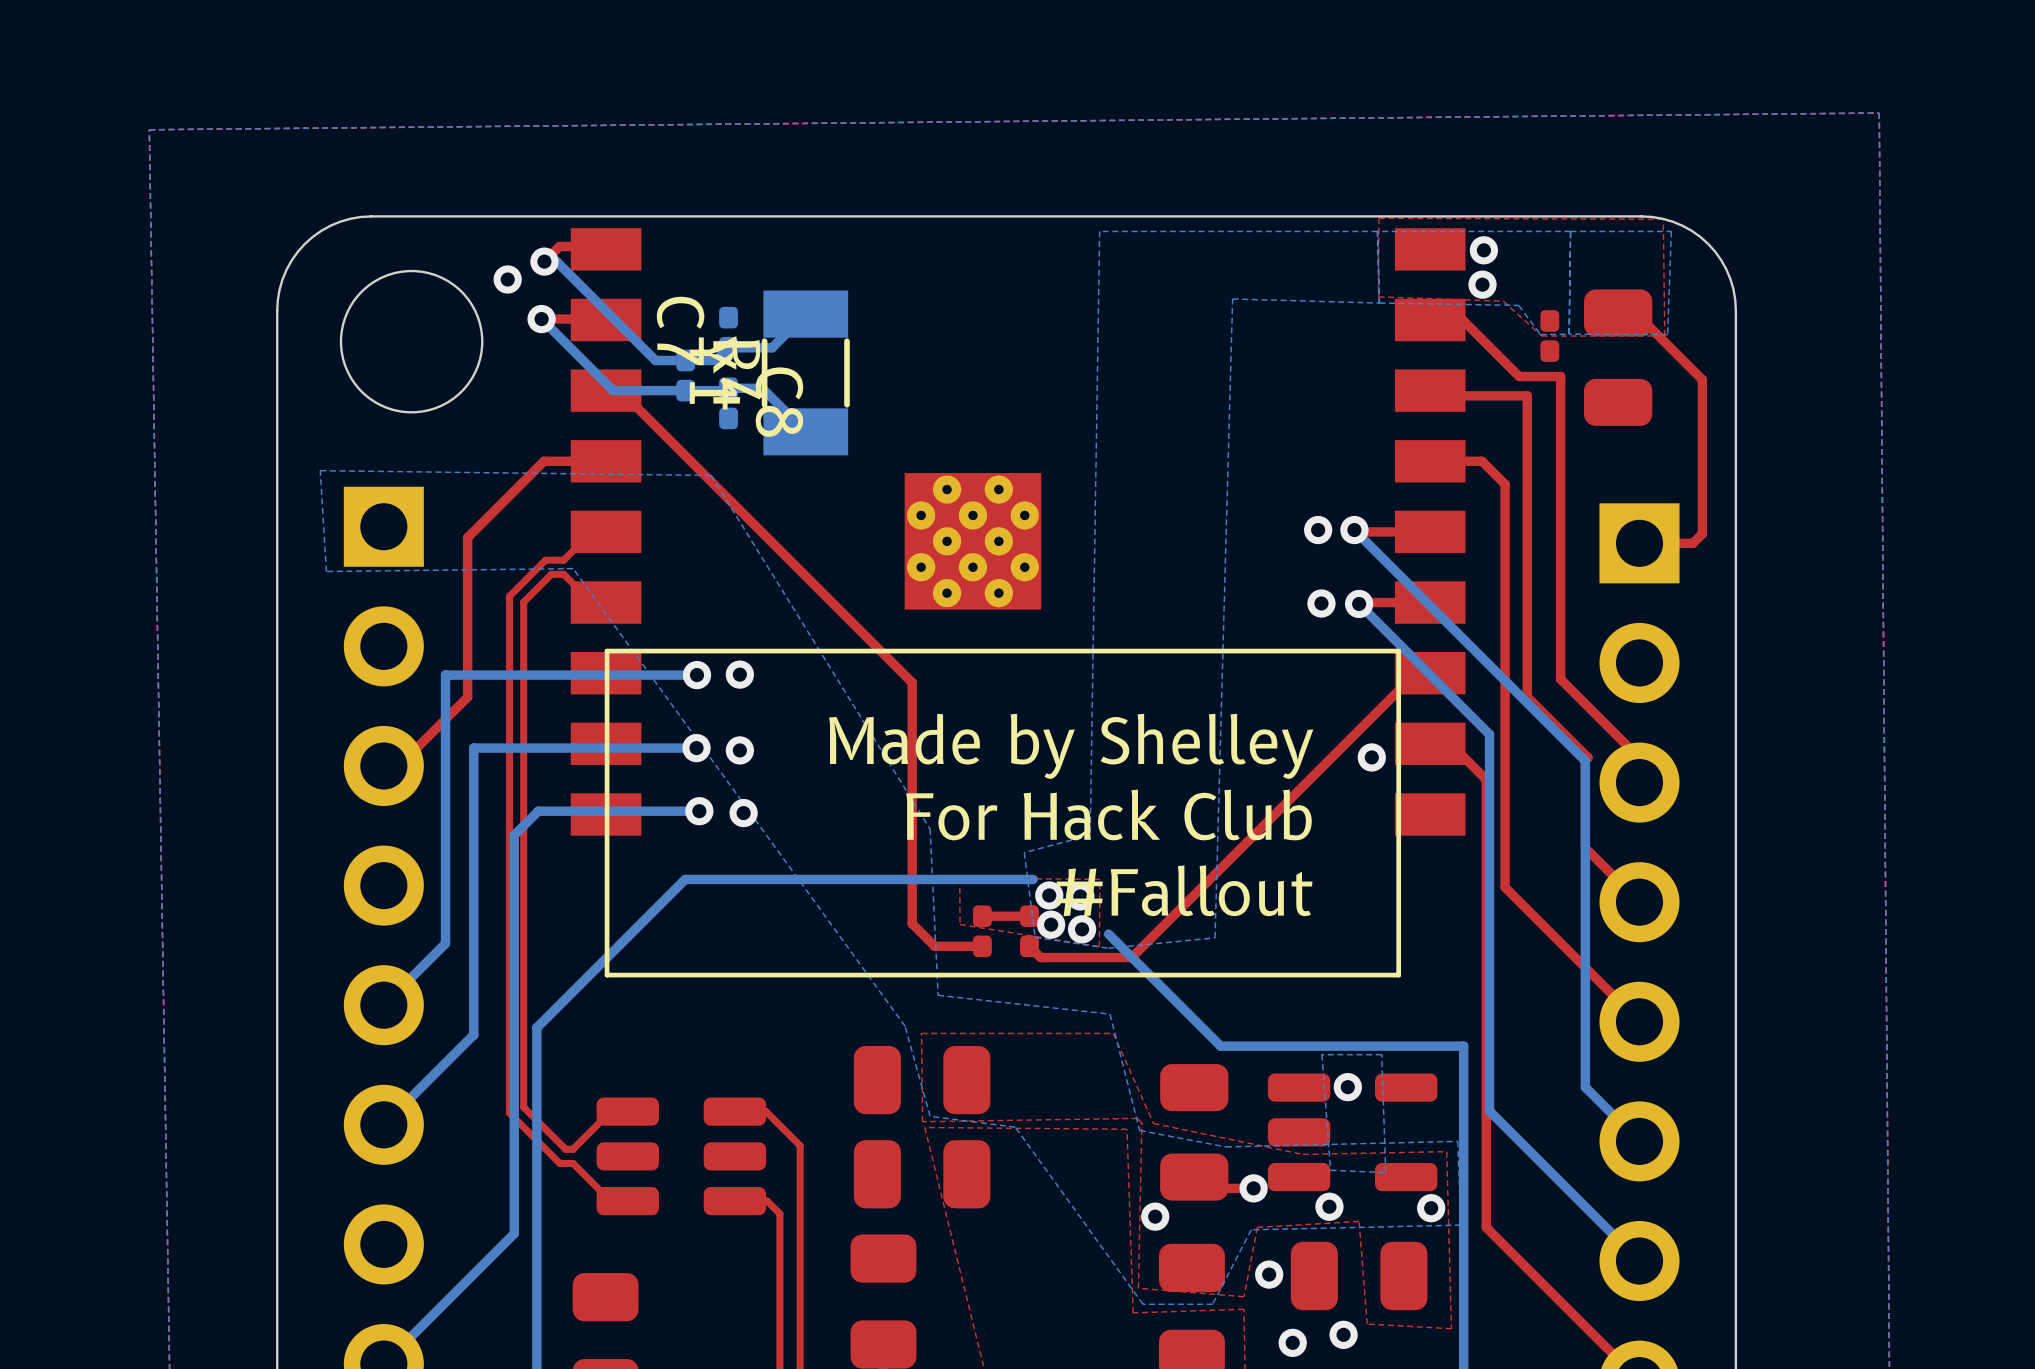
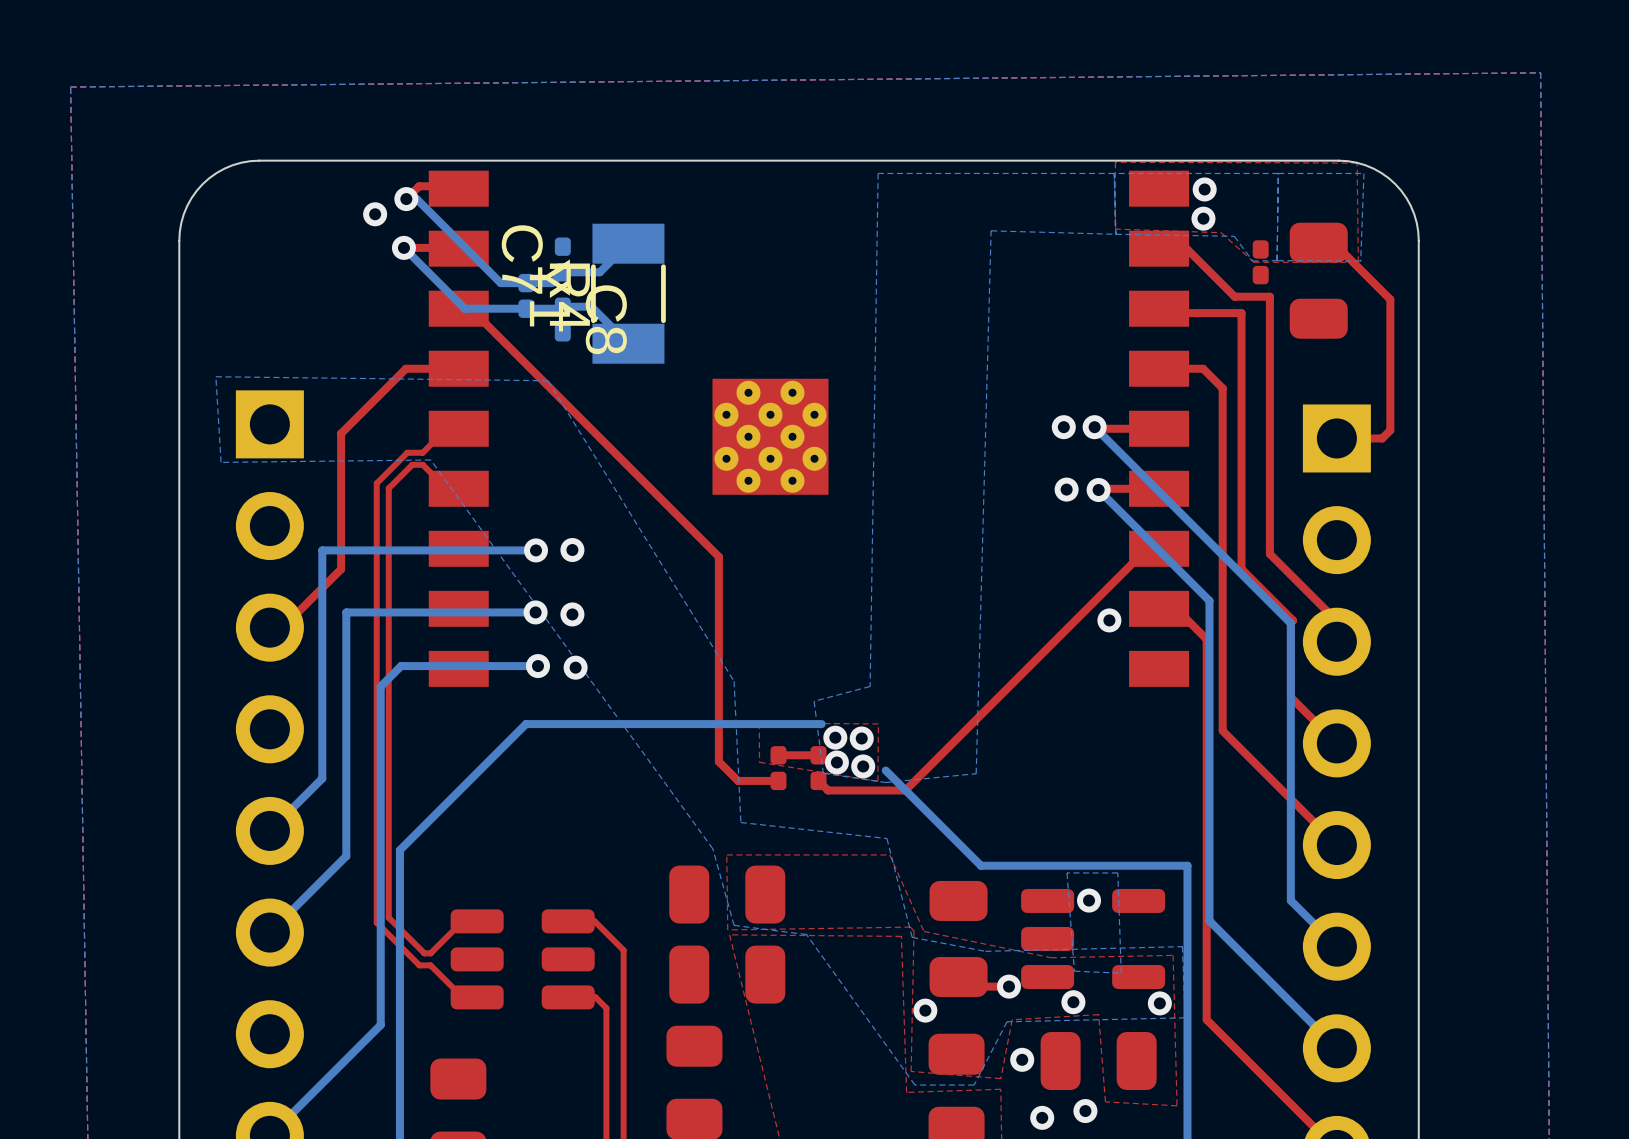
round board edge: [339, 269, 484, 414] -> none
line: (1398, 651) (607, 651) (607, 975) (1398, 975) (1398, 651) -> none
text: Made by Shelley (1071, 746) -> none
text: For Hack Club (1108, 814) -> none
text: #Fallout (1184, 890) -> none

